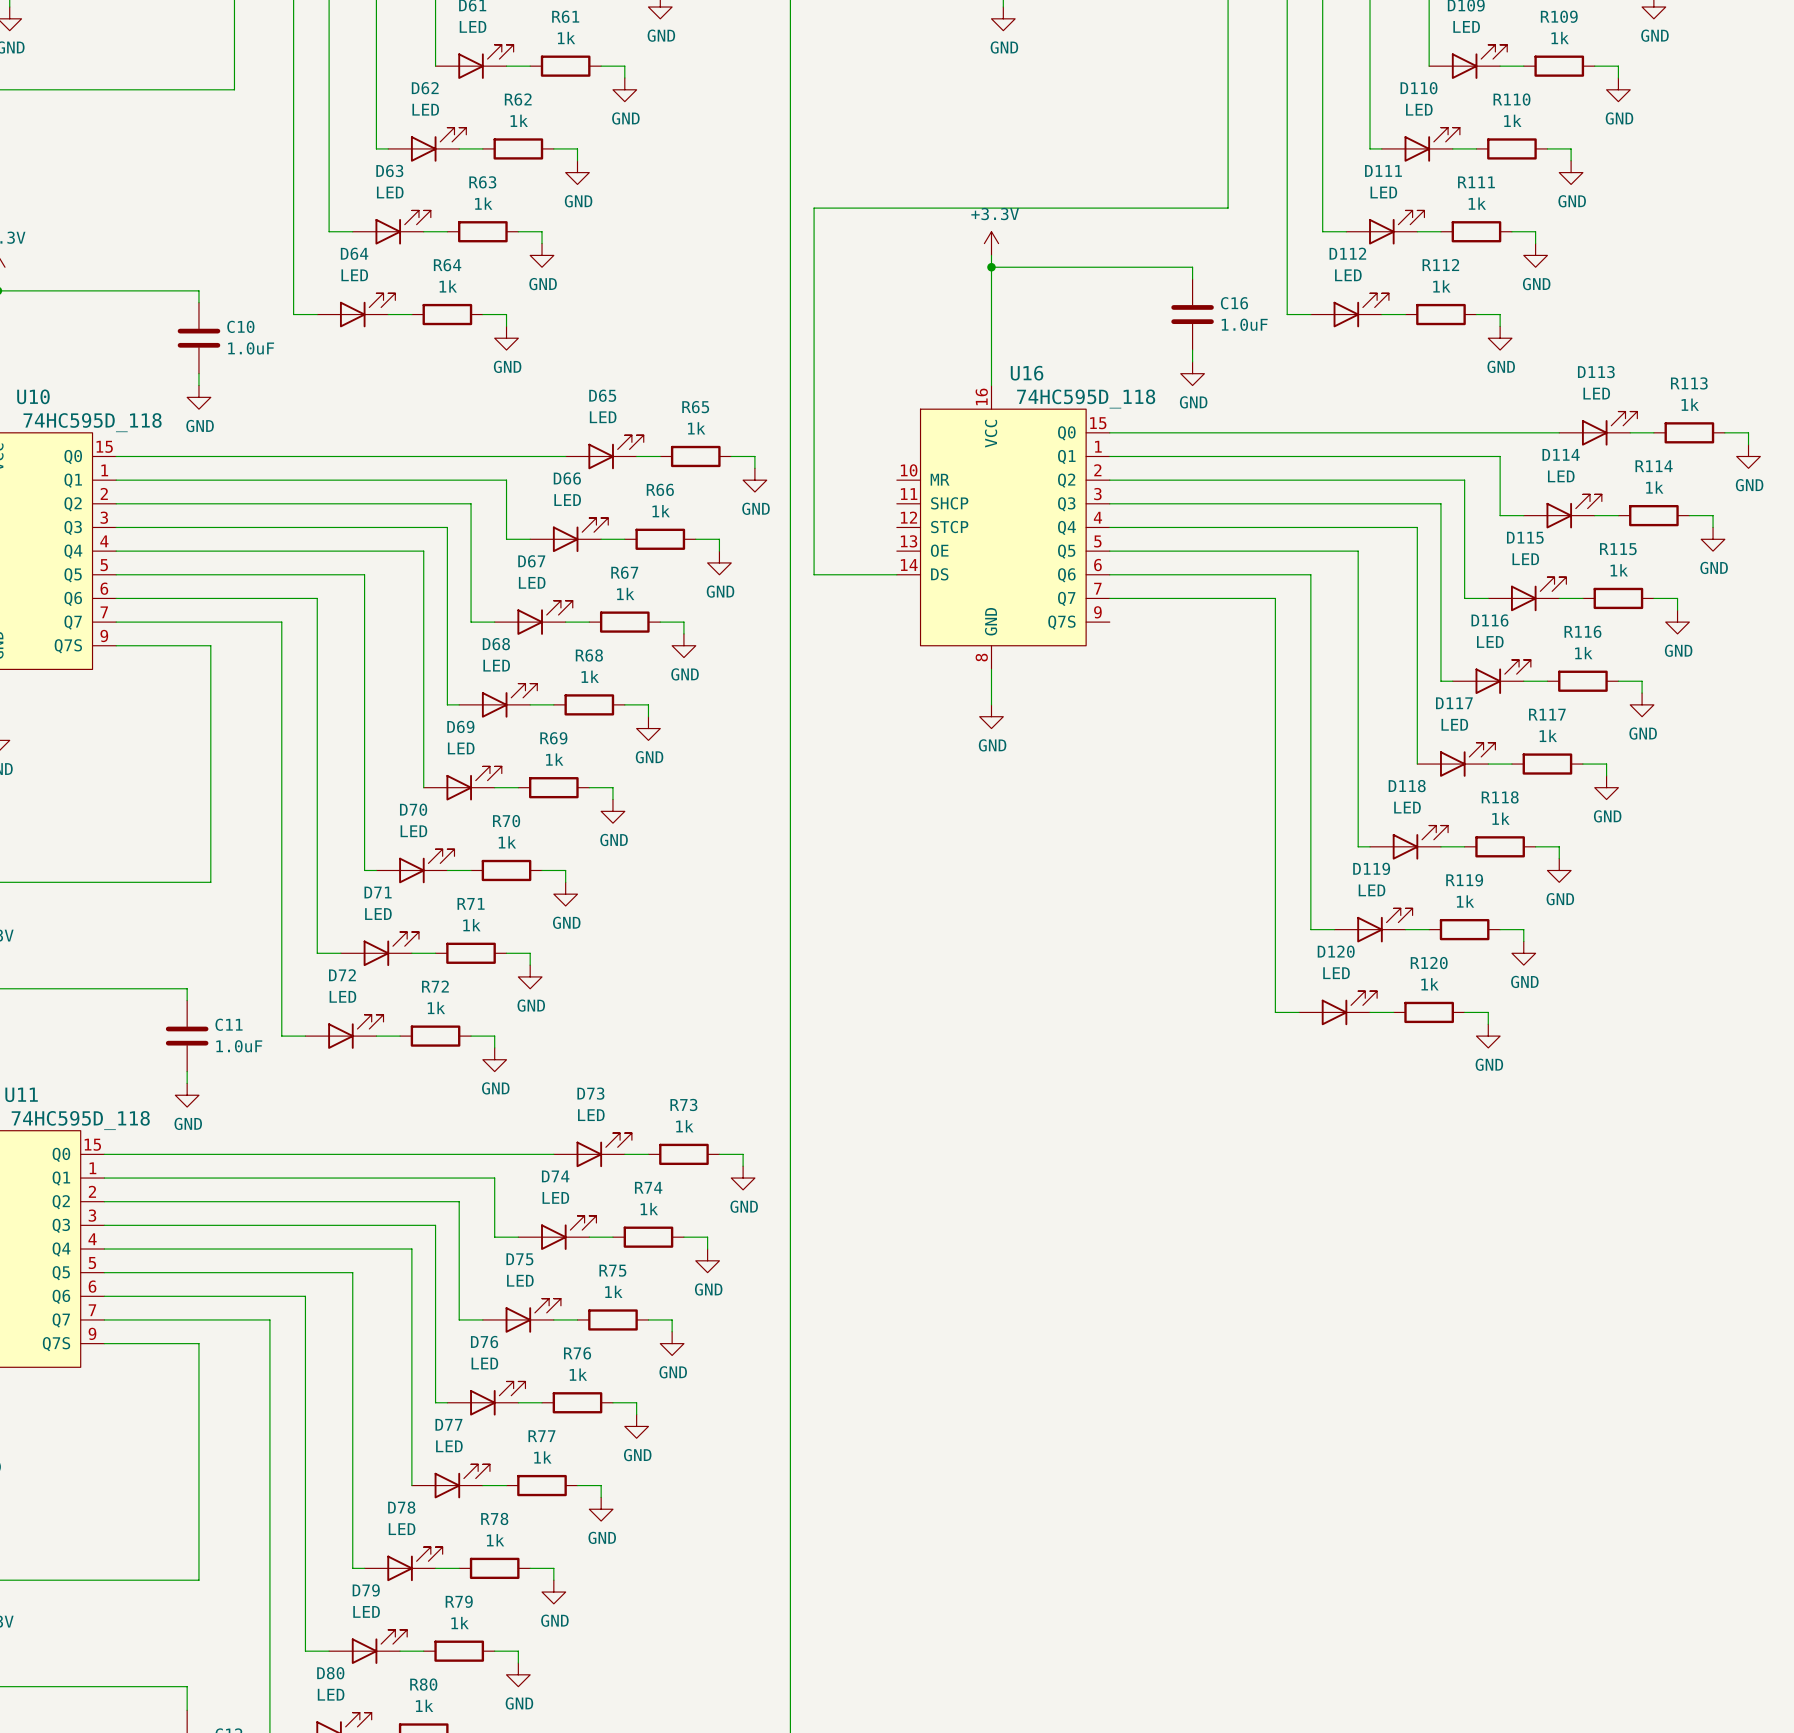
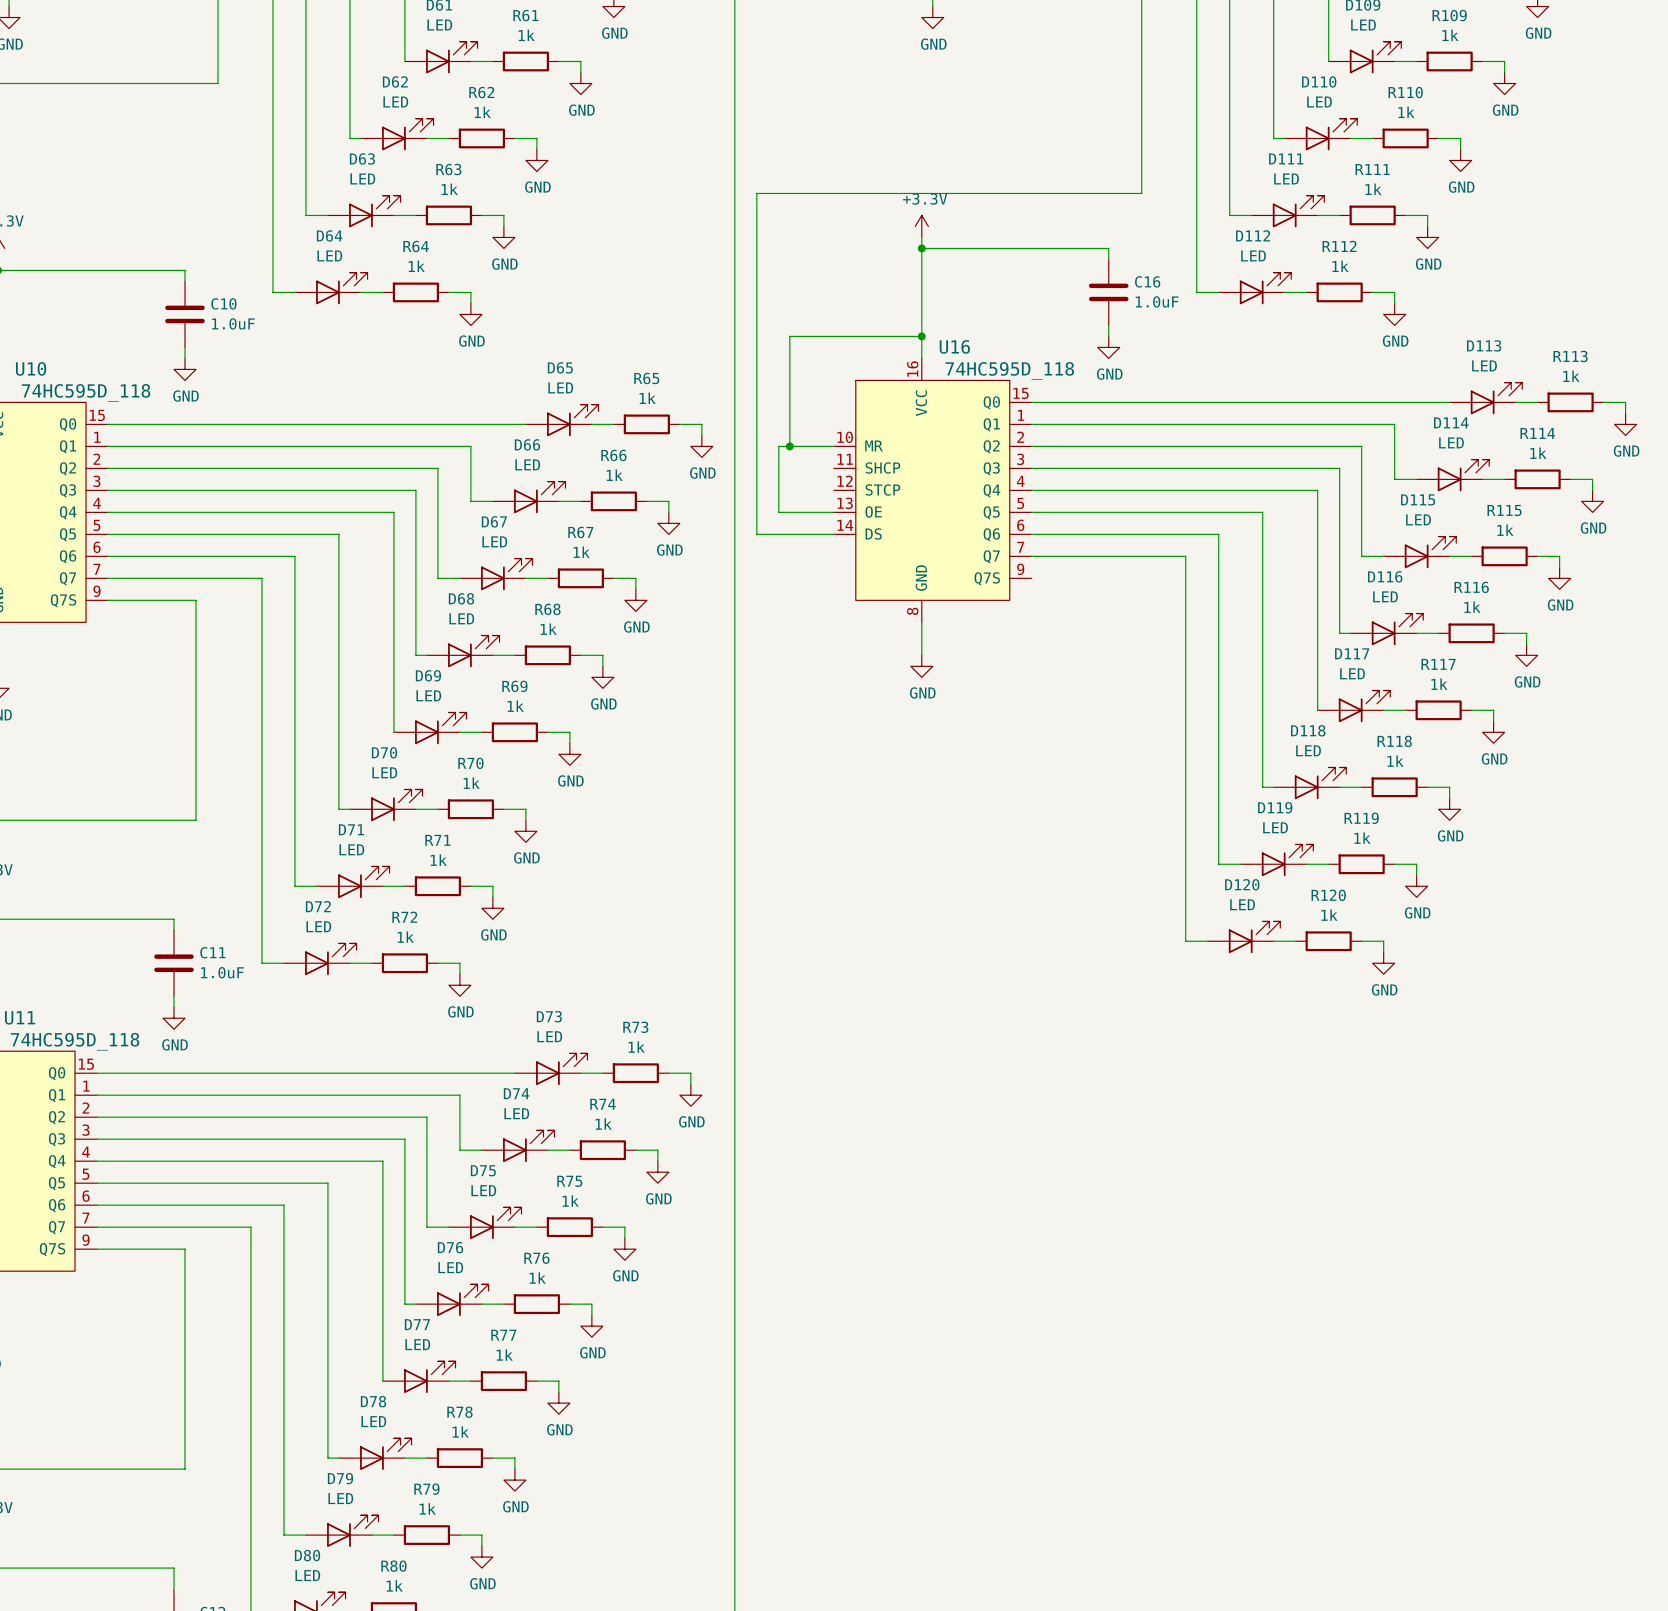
wire: none -> (921, 336) (789, 336) (789, 446)
junction: none -> (921, 336)
junction: none -> (789, 446)
wire: none -> (833, 446) (778, 446) (778, 512) (833, 512)

